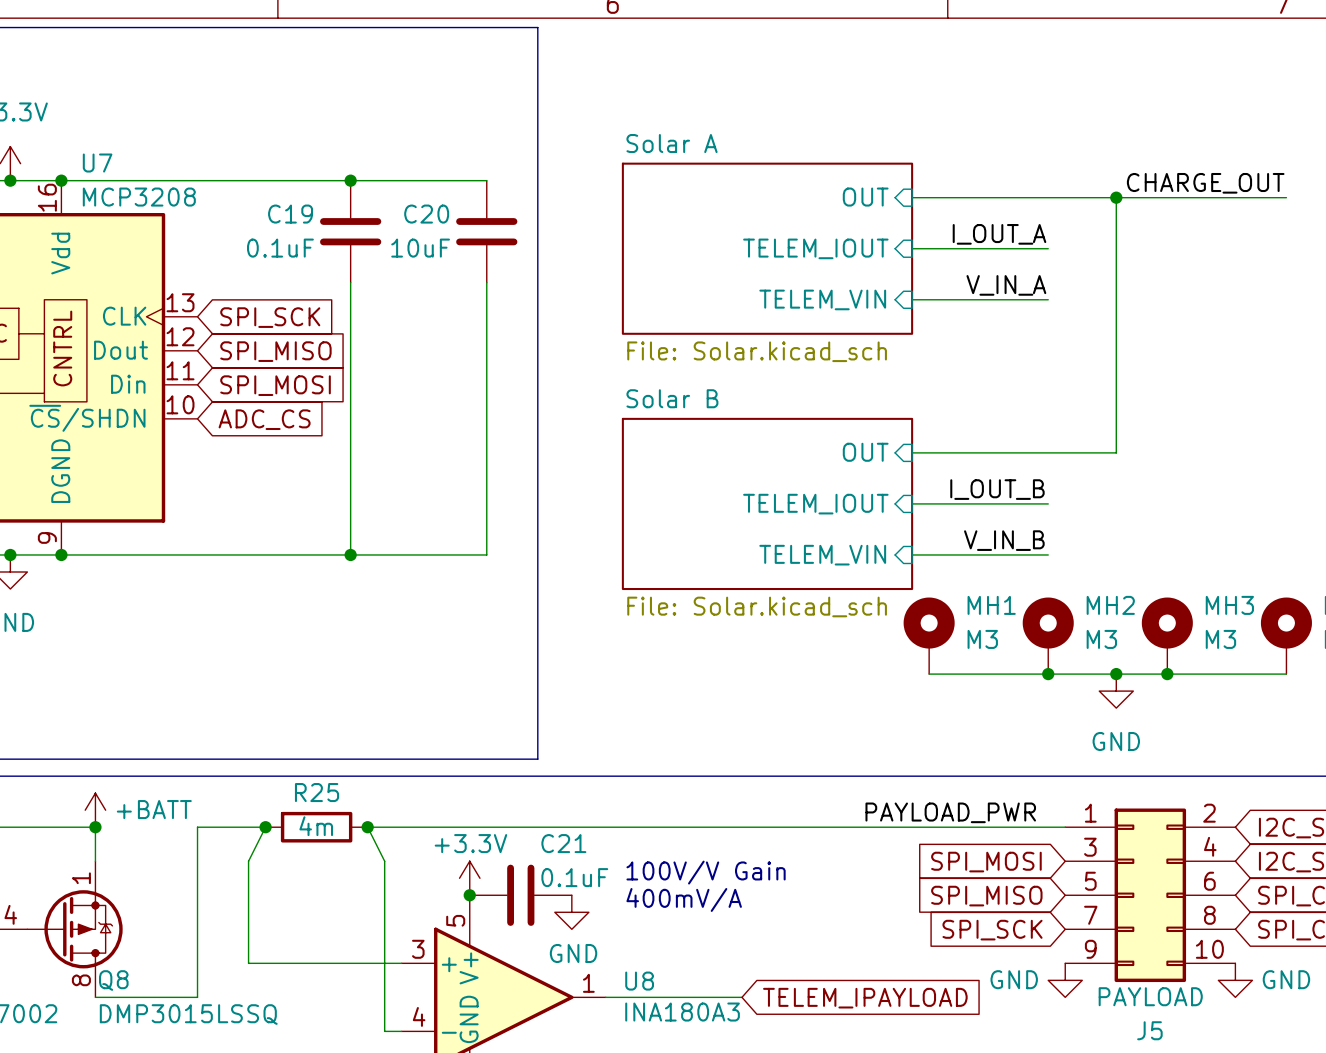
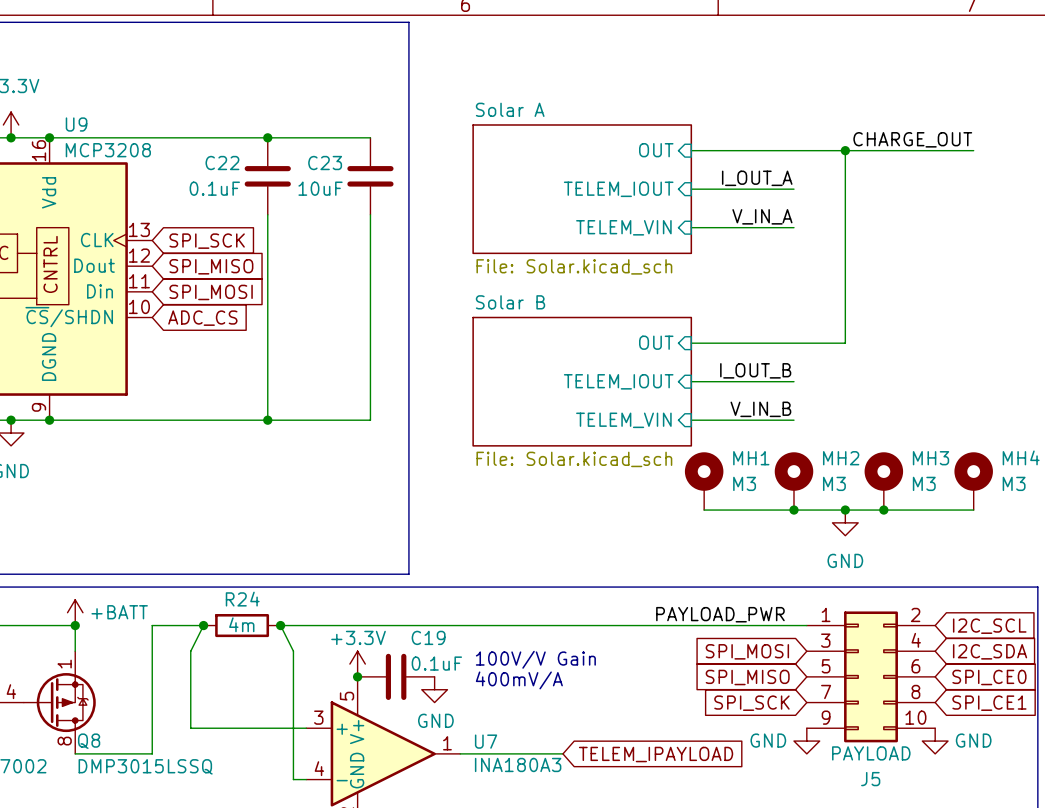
U7 name: U7 (97, 163) -> U9 (76, 124)
C19 name: C19 (290, 214) -> C22 (222, 163)
C20 name: C20 (426, 214) -> C23 (325, 163)
R25 name: R25 (317, 792) -> R24 (242, 599)
C21 name: C21 (563, 843) -> C19 (428, 637)
U8 name: U8 (639, 981) -> U7 (486, 741)

